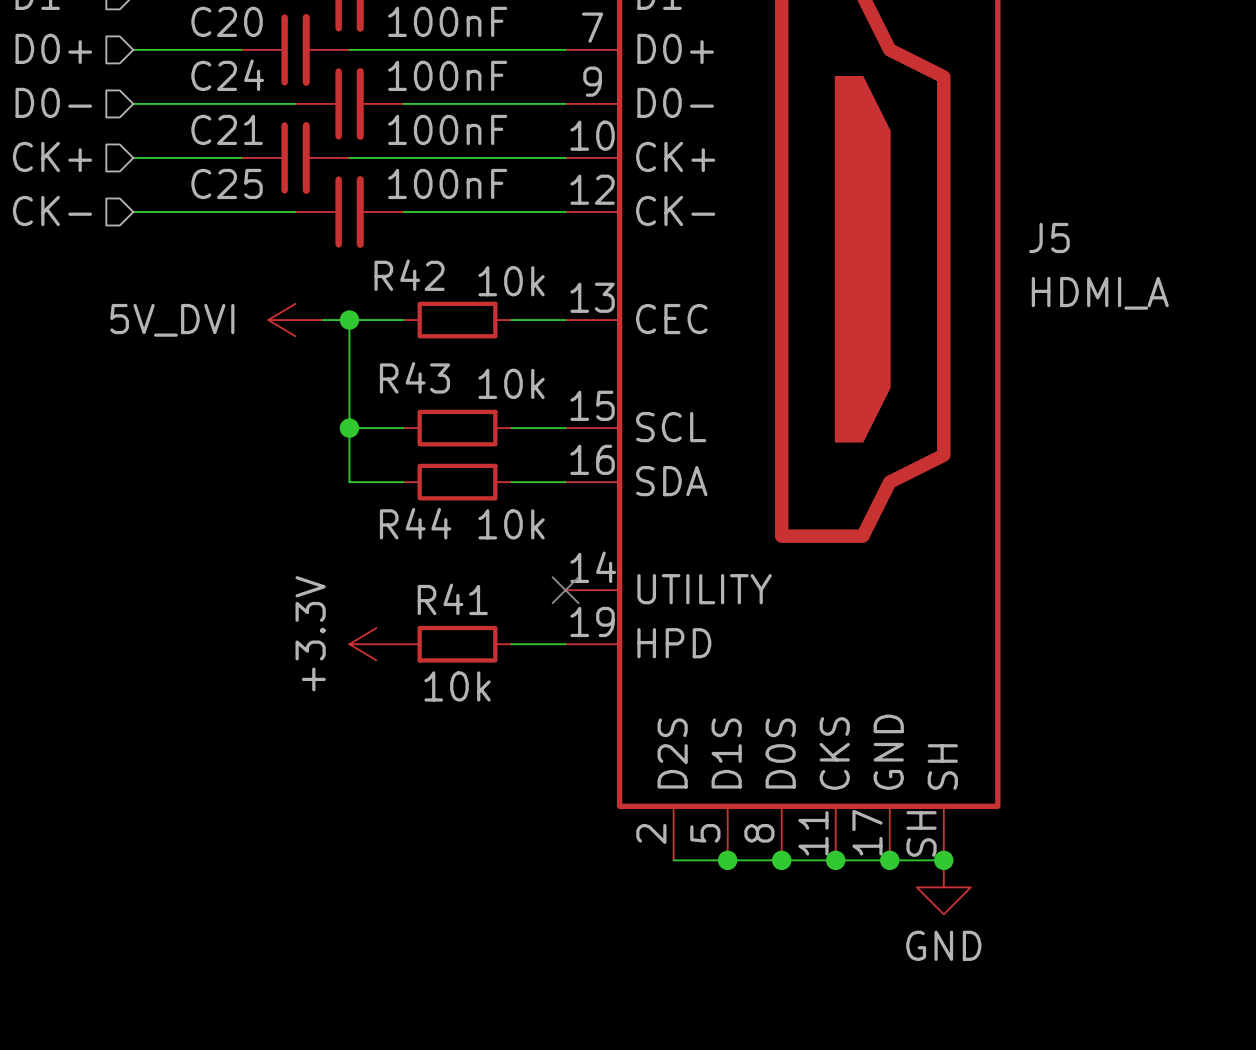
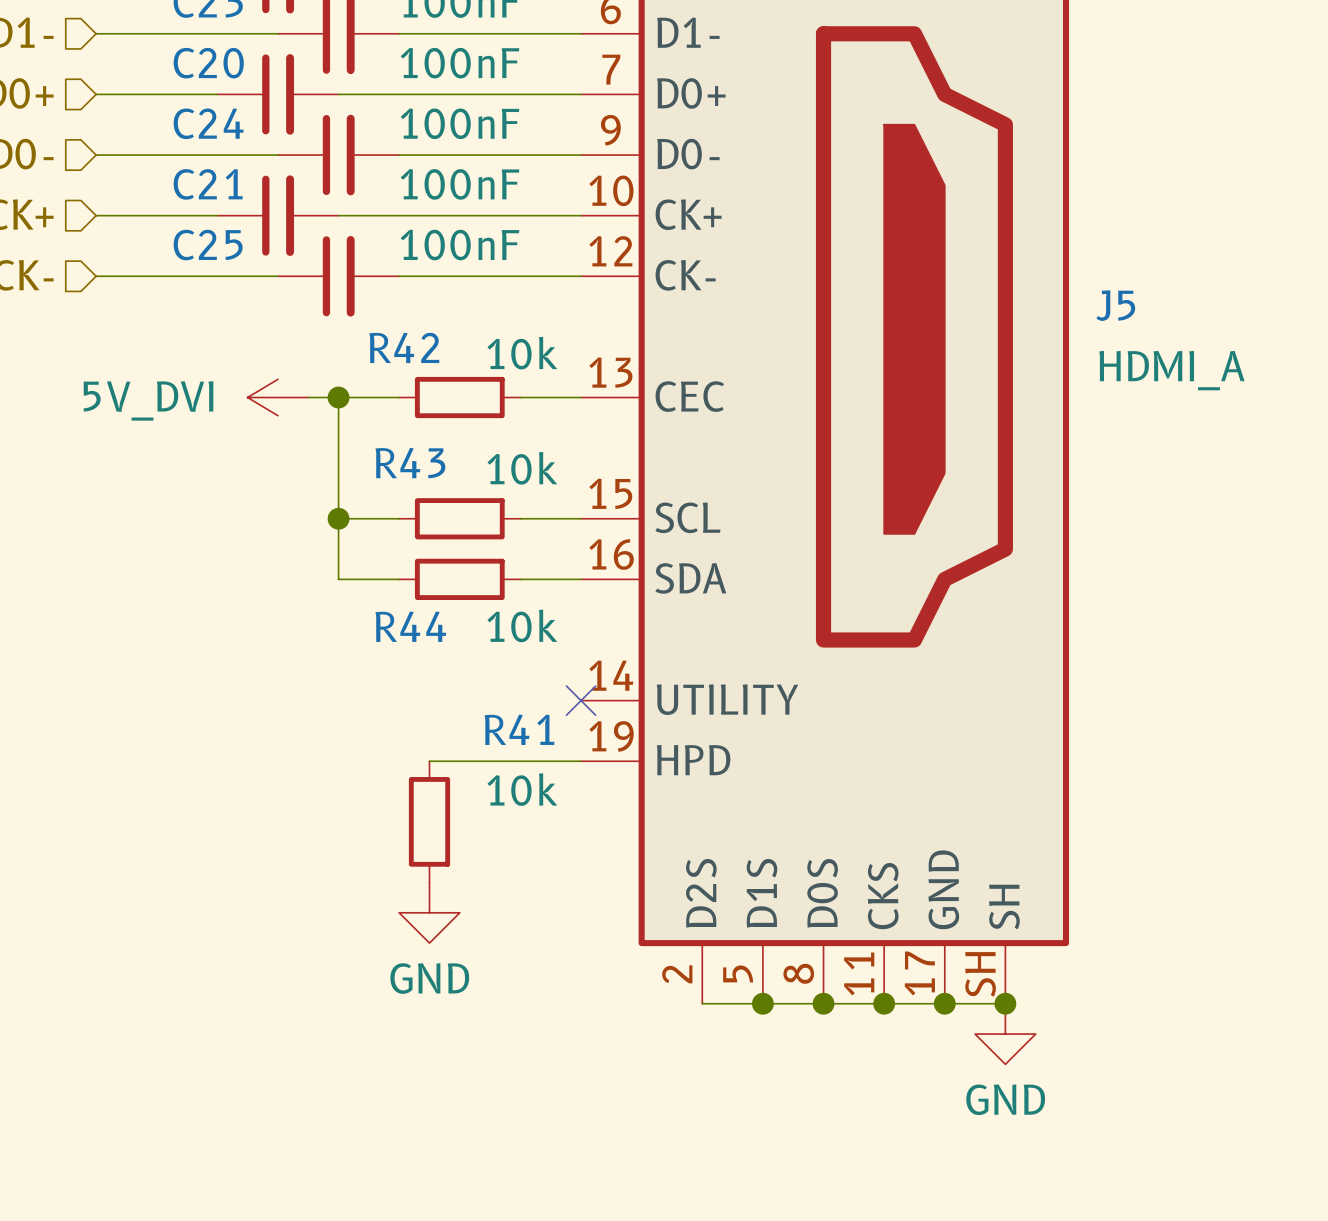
R41 name position: R41 (452, 599) -> R41 (519, 729)
power symbol: +3.3V (376, 644) -> none
wire: none -> (429, 761) (520, 761)
R41 rotation: 0° (457, 644) -> 90° clockwise (429, 821)
R41 value position: 10k (457, 686) -> 10k (522, 789)
power symbol: none -> GND (429, 912)

